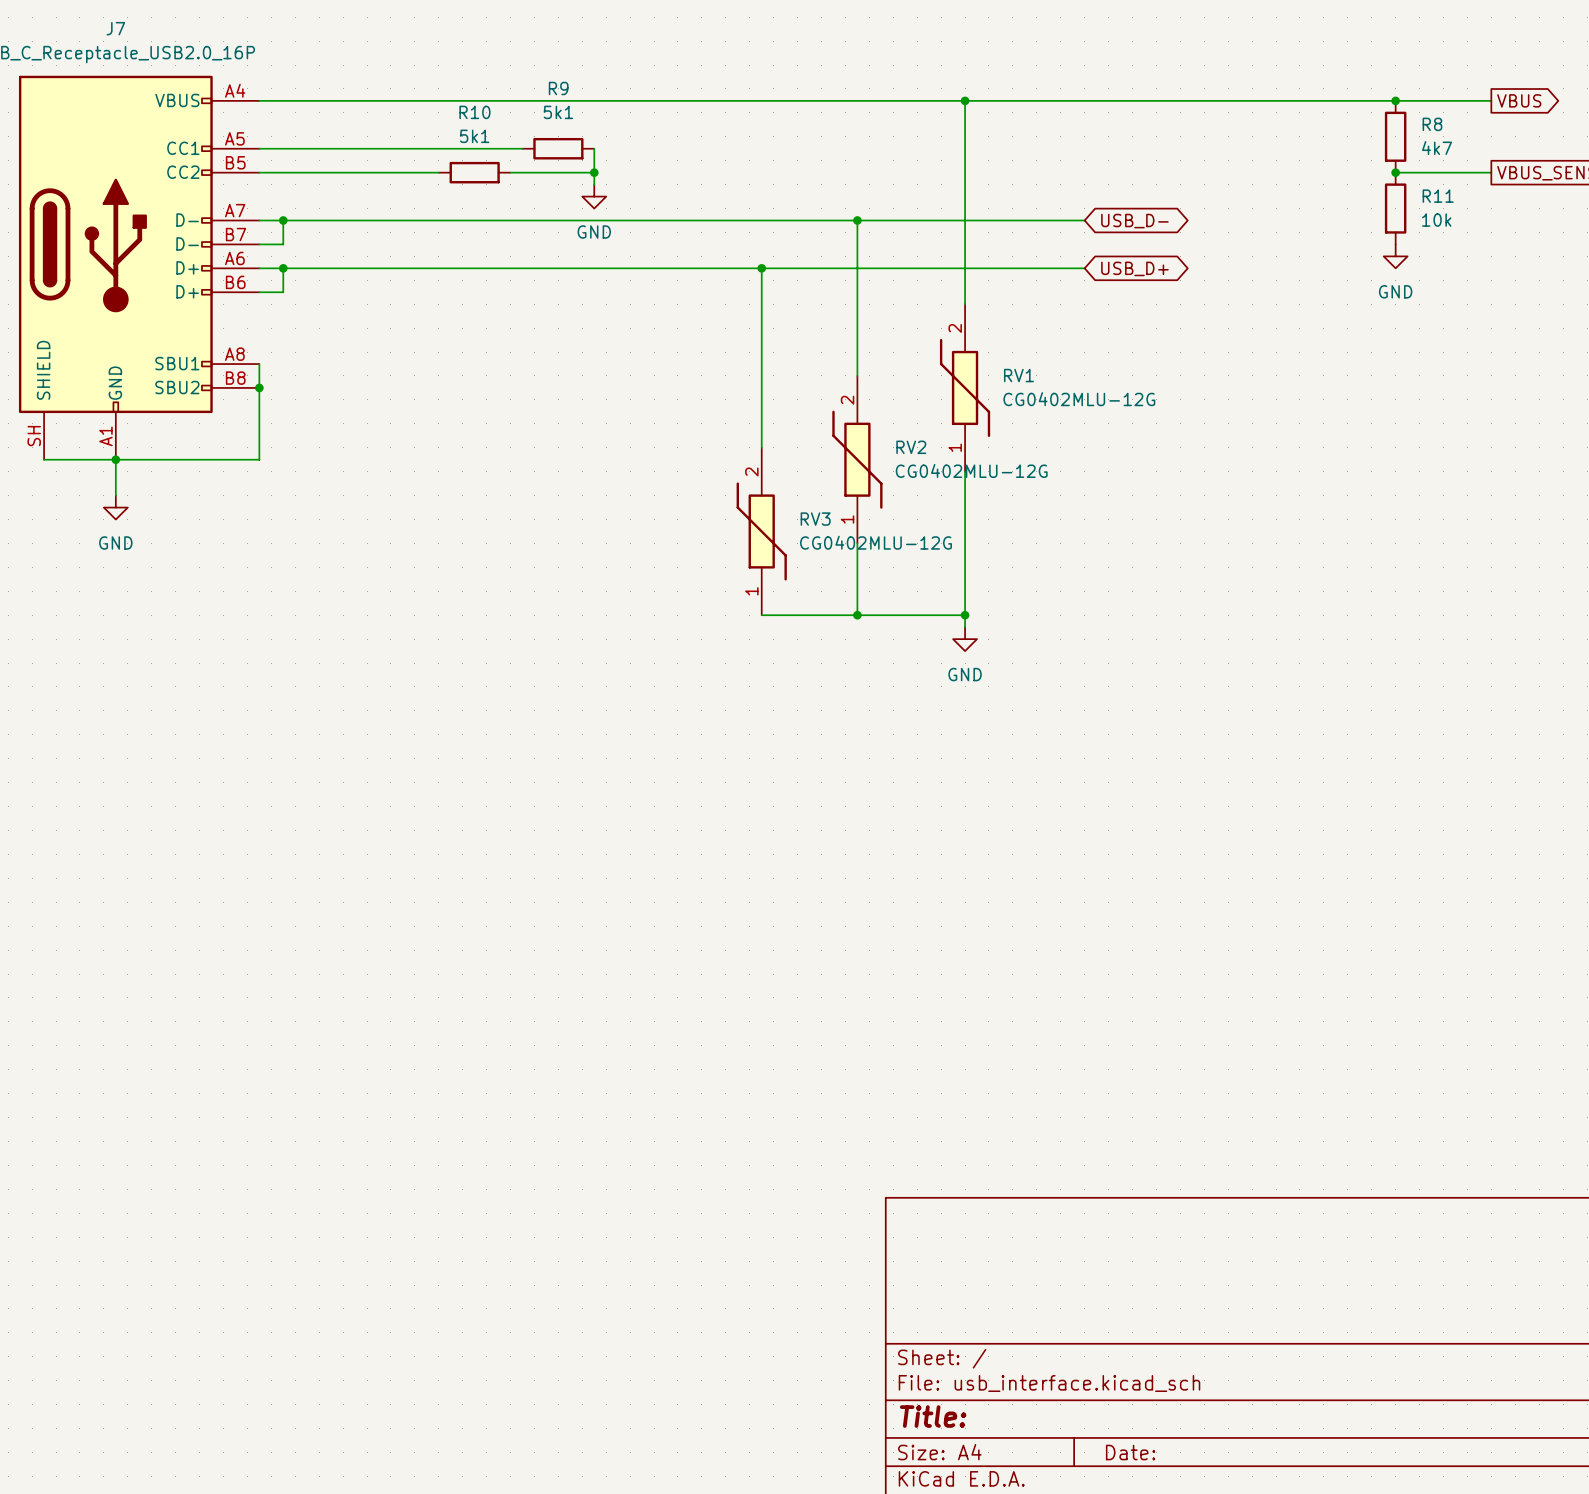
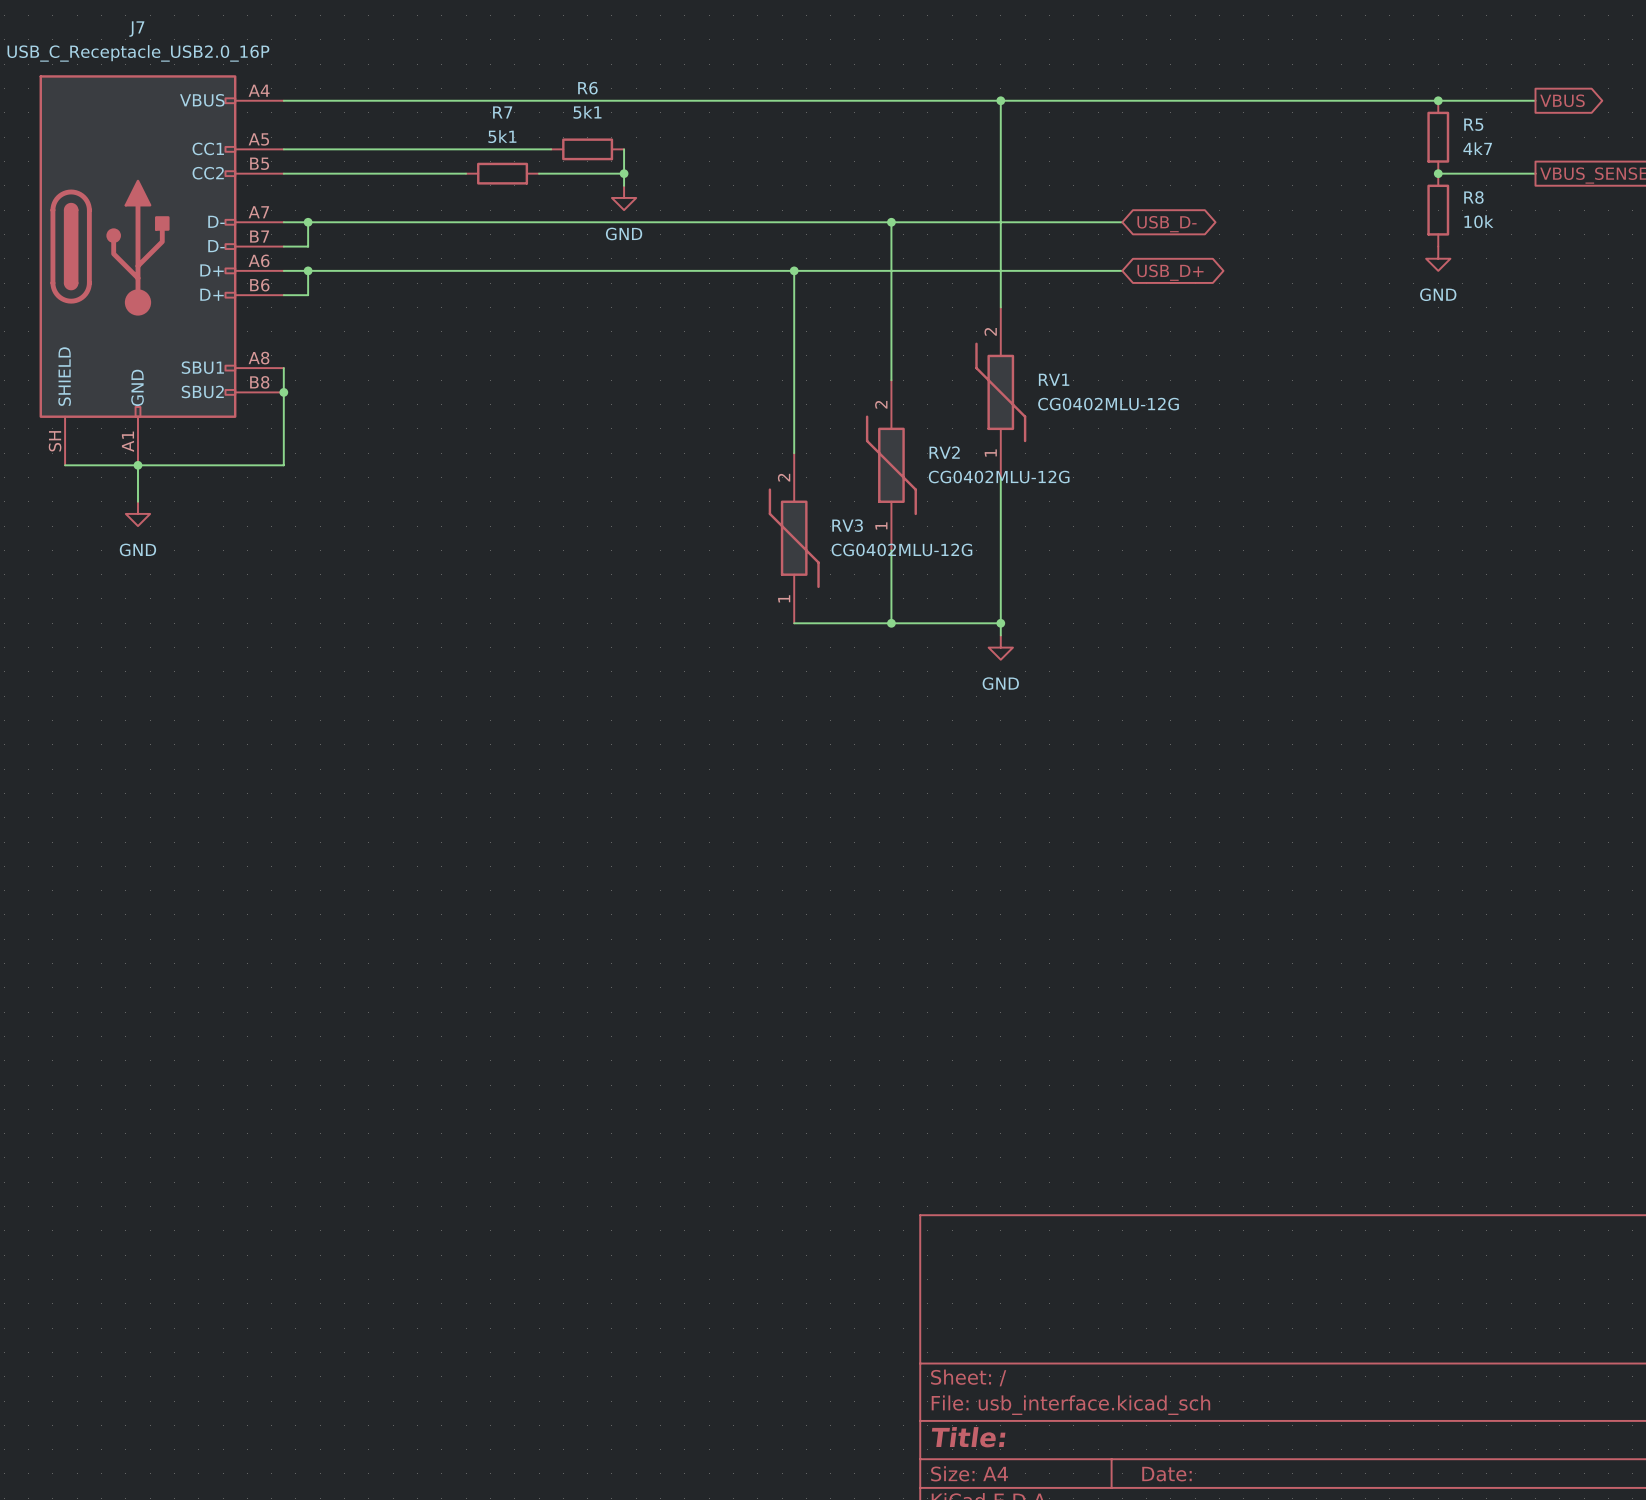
R9 name: R9 (558, 88) -> R6 (587, 88)
R10 name: R10 (474, 112) -> R7 (502, 112)
R8 name: R8 (1432, 124) -> R5 (1473, 124)
R11 name: R11 (1438, 196) -> R8 (1473, 197)

